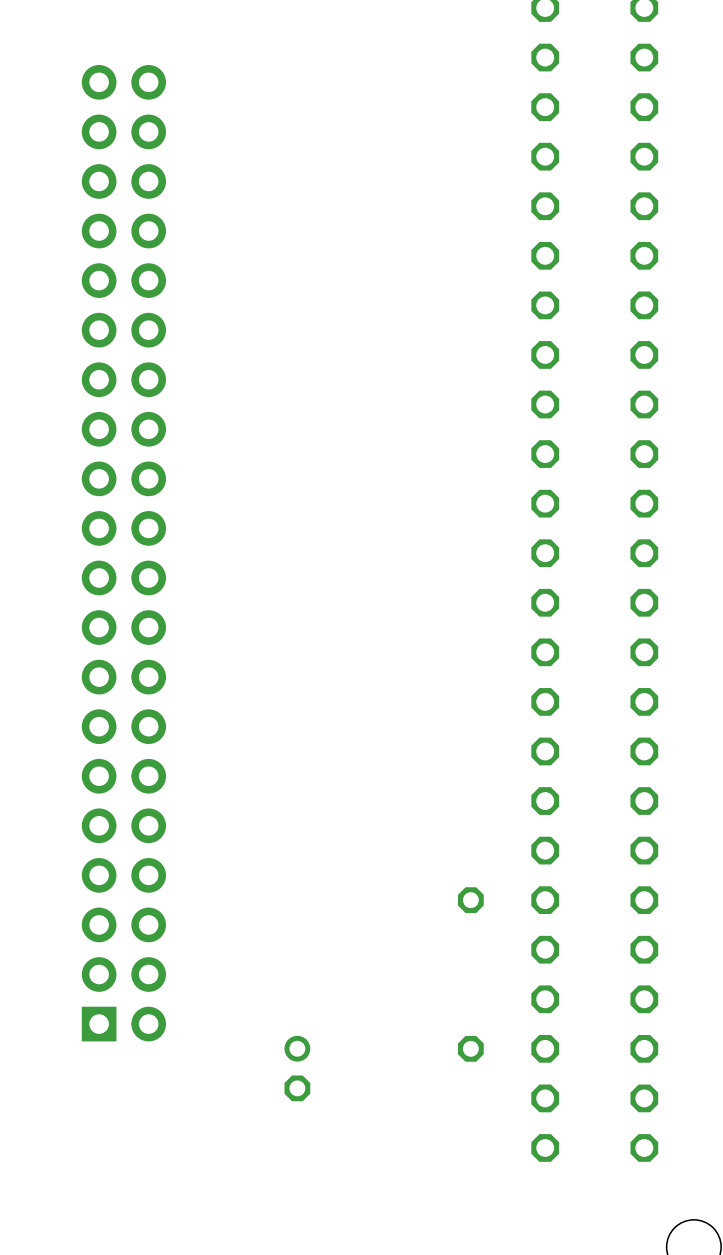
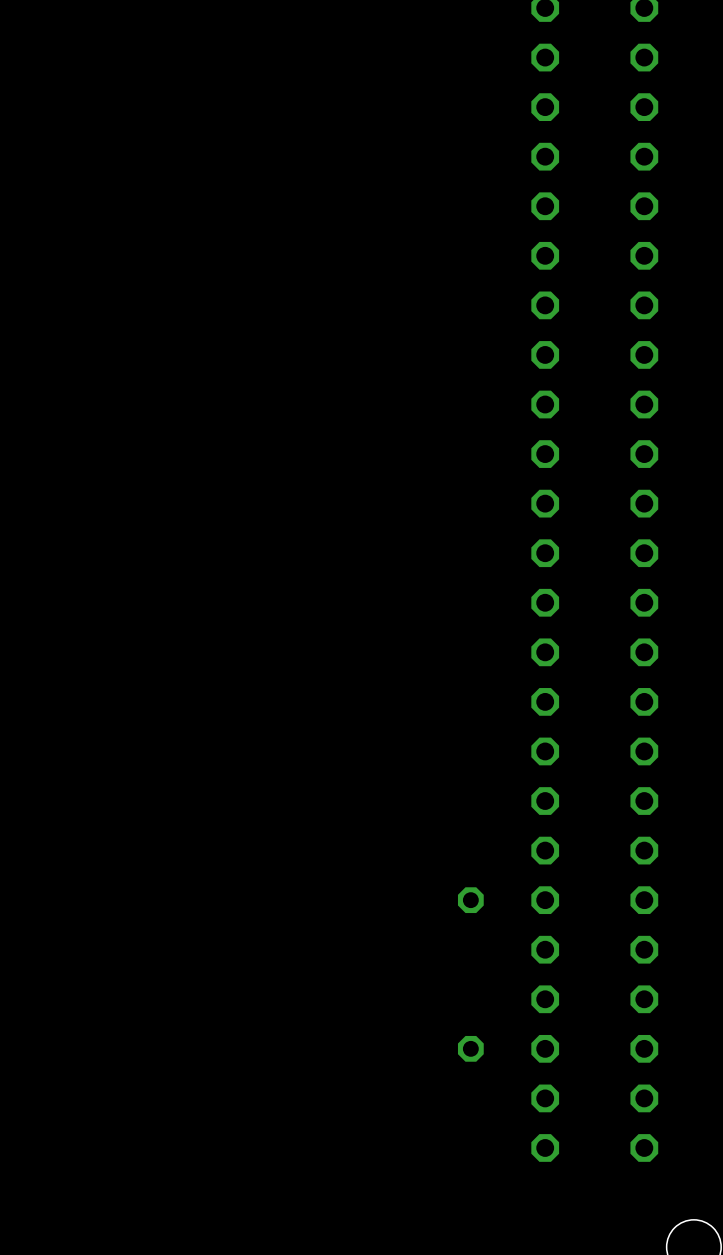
part: (123, 553) -> none
part: (297, 1068) -> none

